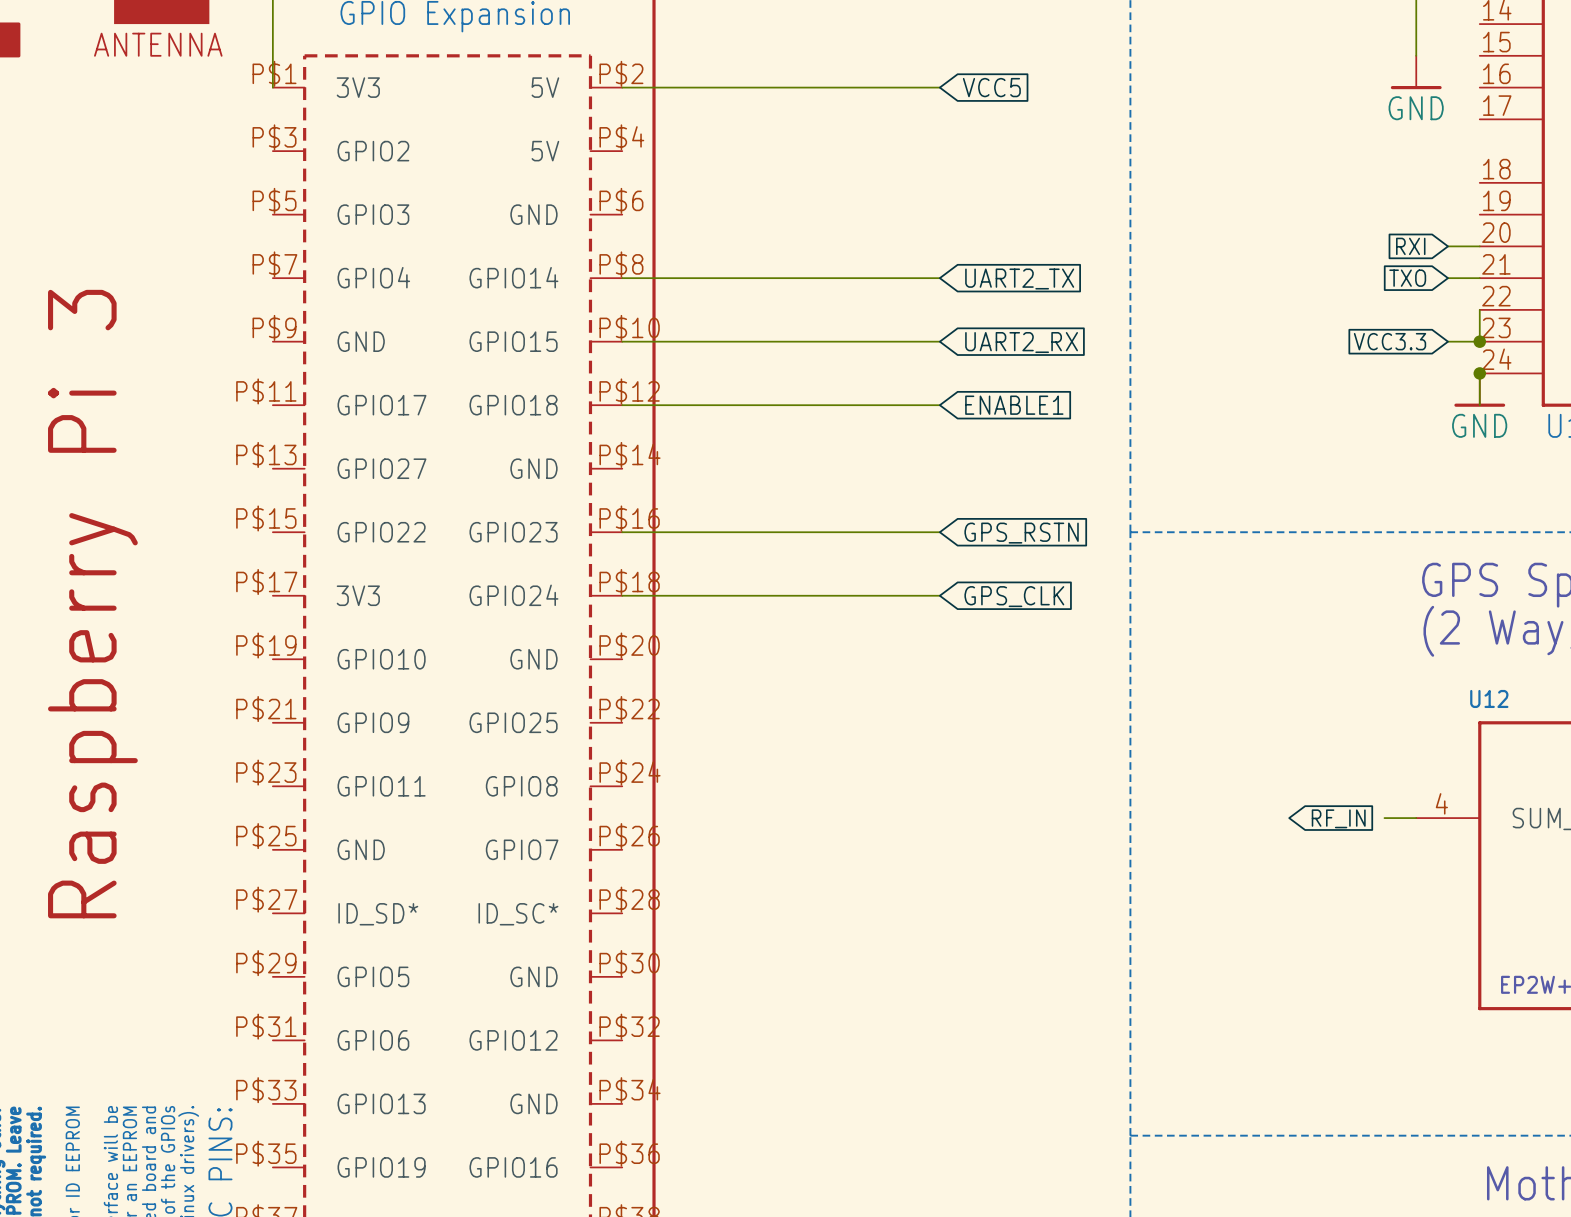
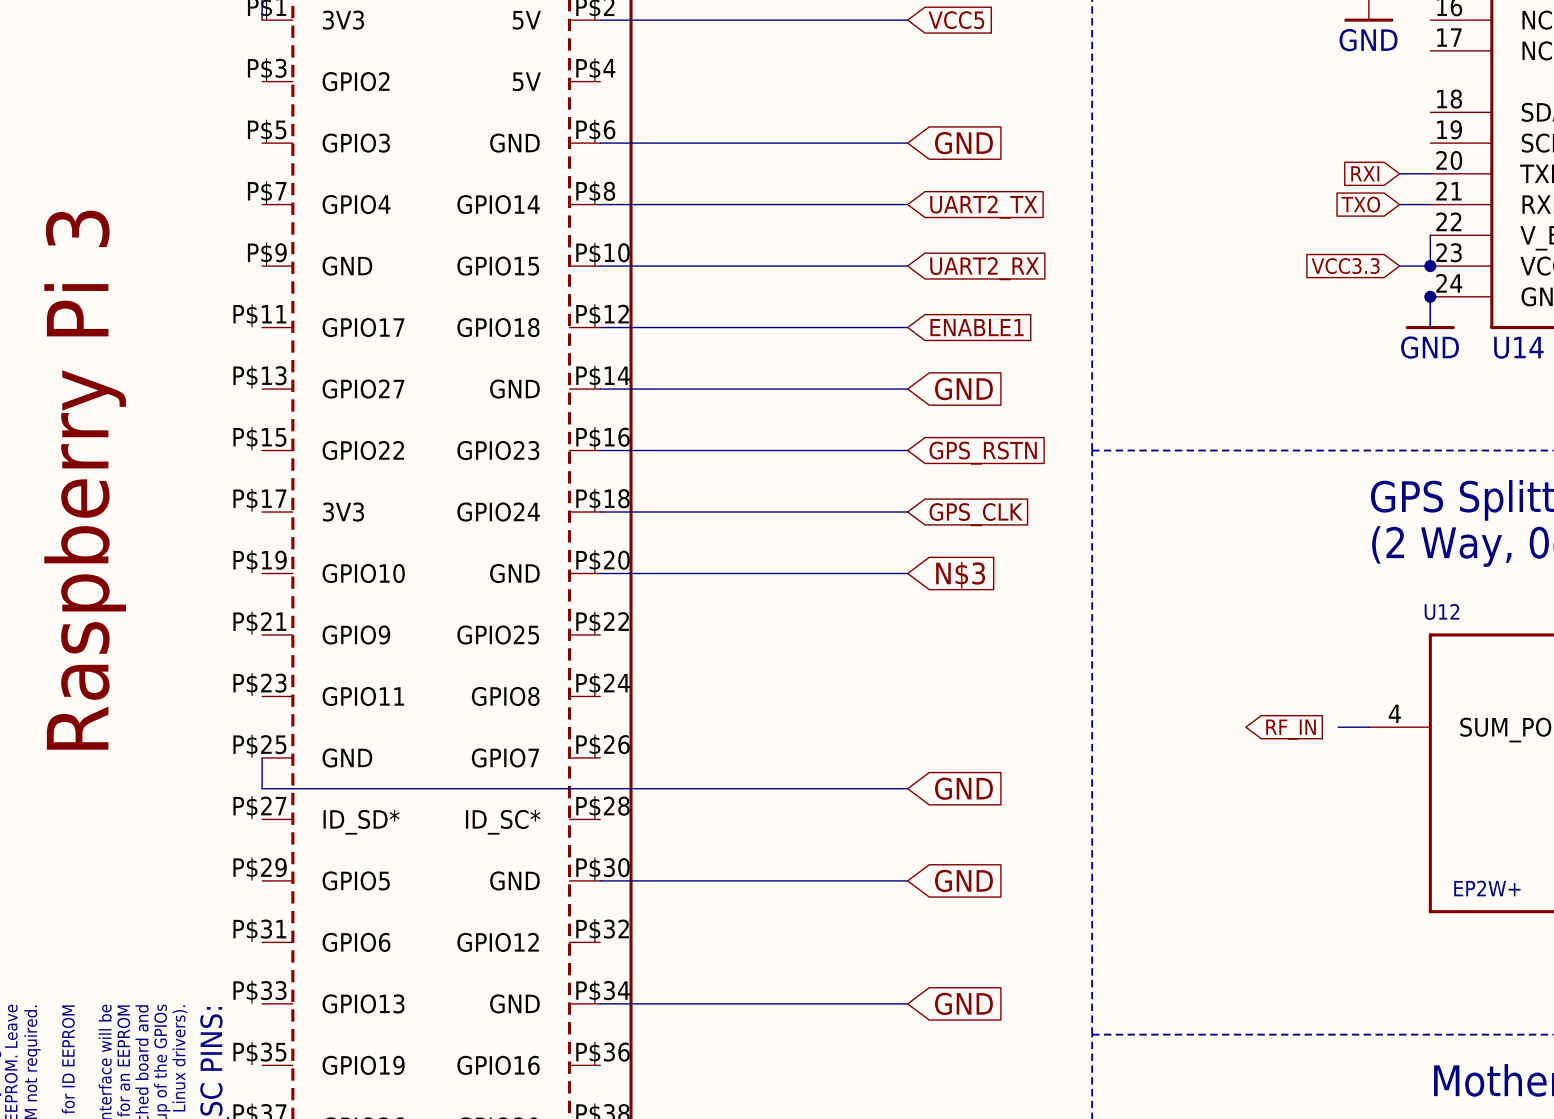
wire: none -> (600, 143) (907, 143)
global label: none -> GND (963, 143)
wire: none -> (600, 389) (907, 389)
global label: none -> GND (963, 389)
wire: none -> (600, 573) (907, 573)
global label: none -> N$3 (960, 575)
wire: none -> (262, 757) (262, 788) (907, 788)
global label: none -> GND (963, 788)
wire: none -> (600, 880) (907, 880)
global label: none -> GND (963, 880)
wire: none -> (600, 1003) (907, 1003)
global label: none -> GND (963, 1003)

